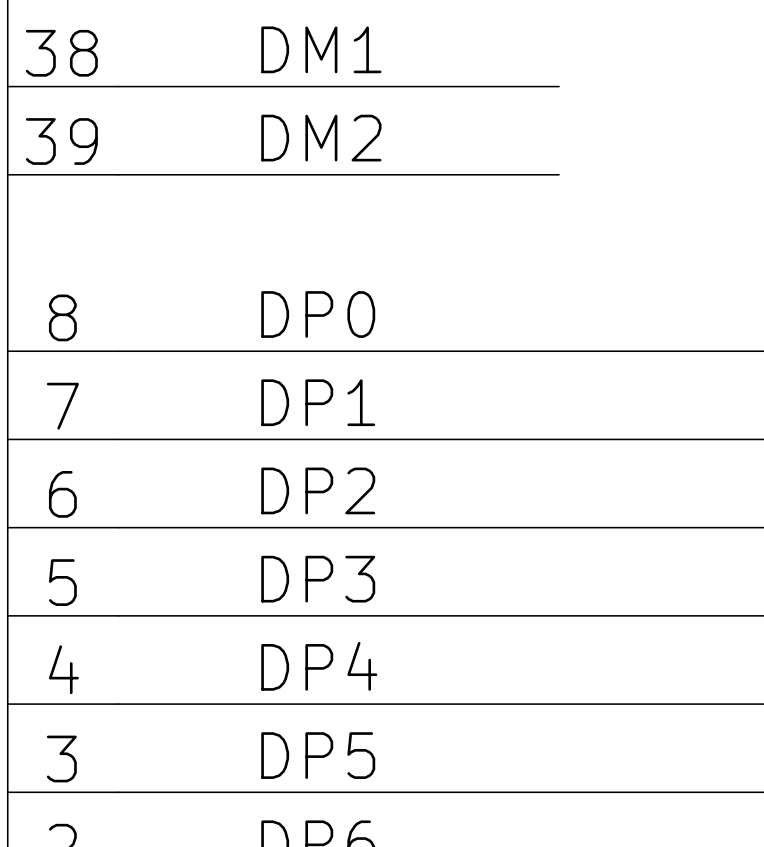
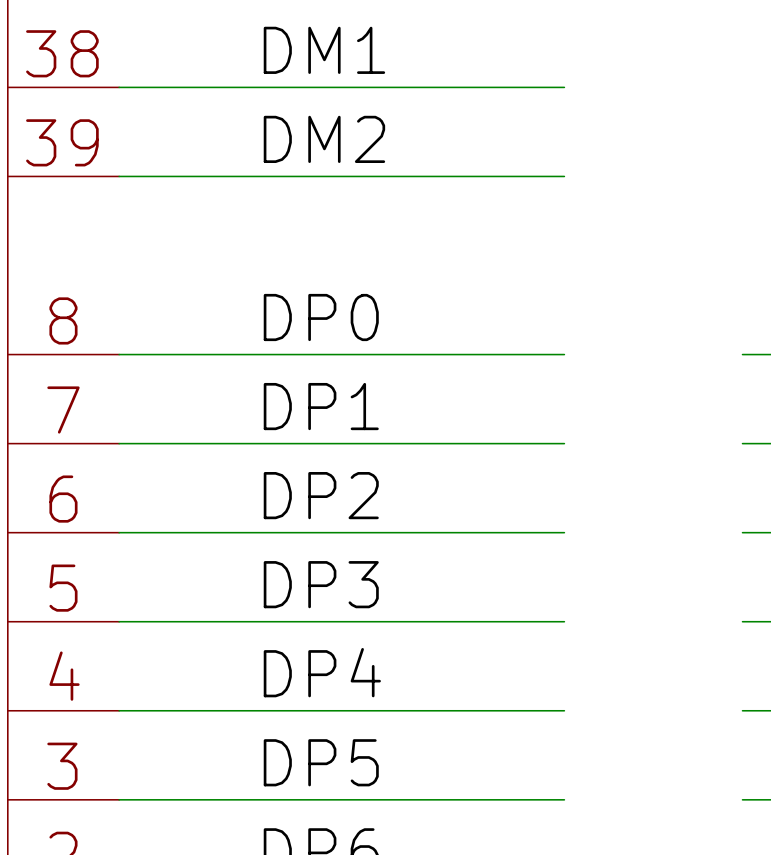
wire: (559, 351) (735, 351) -> none
wire: (559, 439) (735, 439) -> none
wire: (559, 527) (735, 527) -> none
wire: (559, 615) (735, 615) -> none
wire: (559, 704) (735, 704) -> none
wire: (559, 792) (735, 792) -> none

